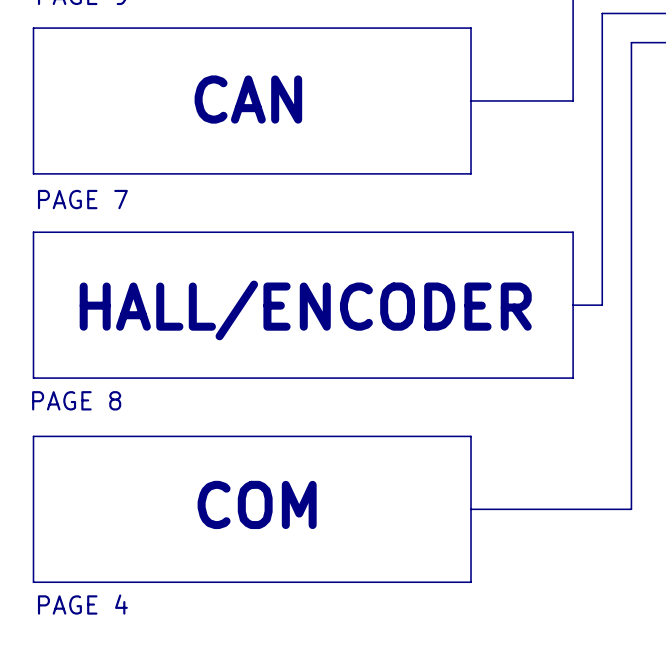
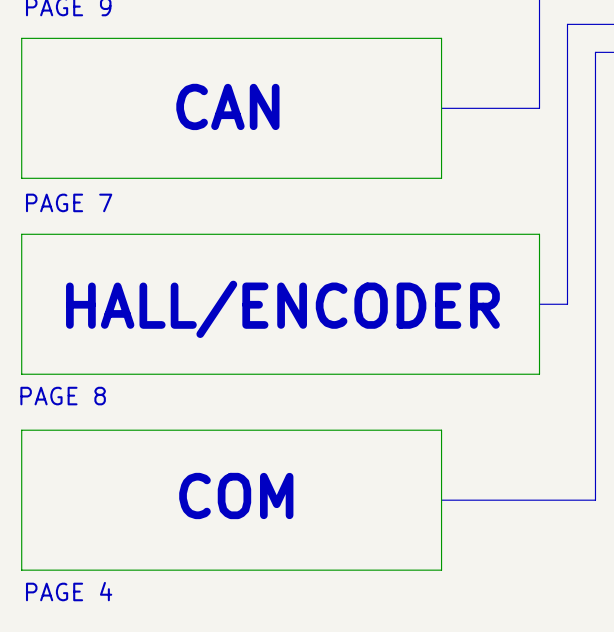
line: (33, 28) (33, 173) (471, 173) (471, 28) (33, 28) -> none
line: (33, 232) (33, 378) (573, 378) (573, 232) (33, 232) -> none
line: (33, 436) (471, 436) (471, 582) (33, 582) (33, 436) -> none

